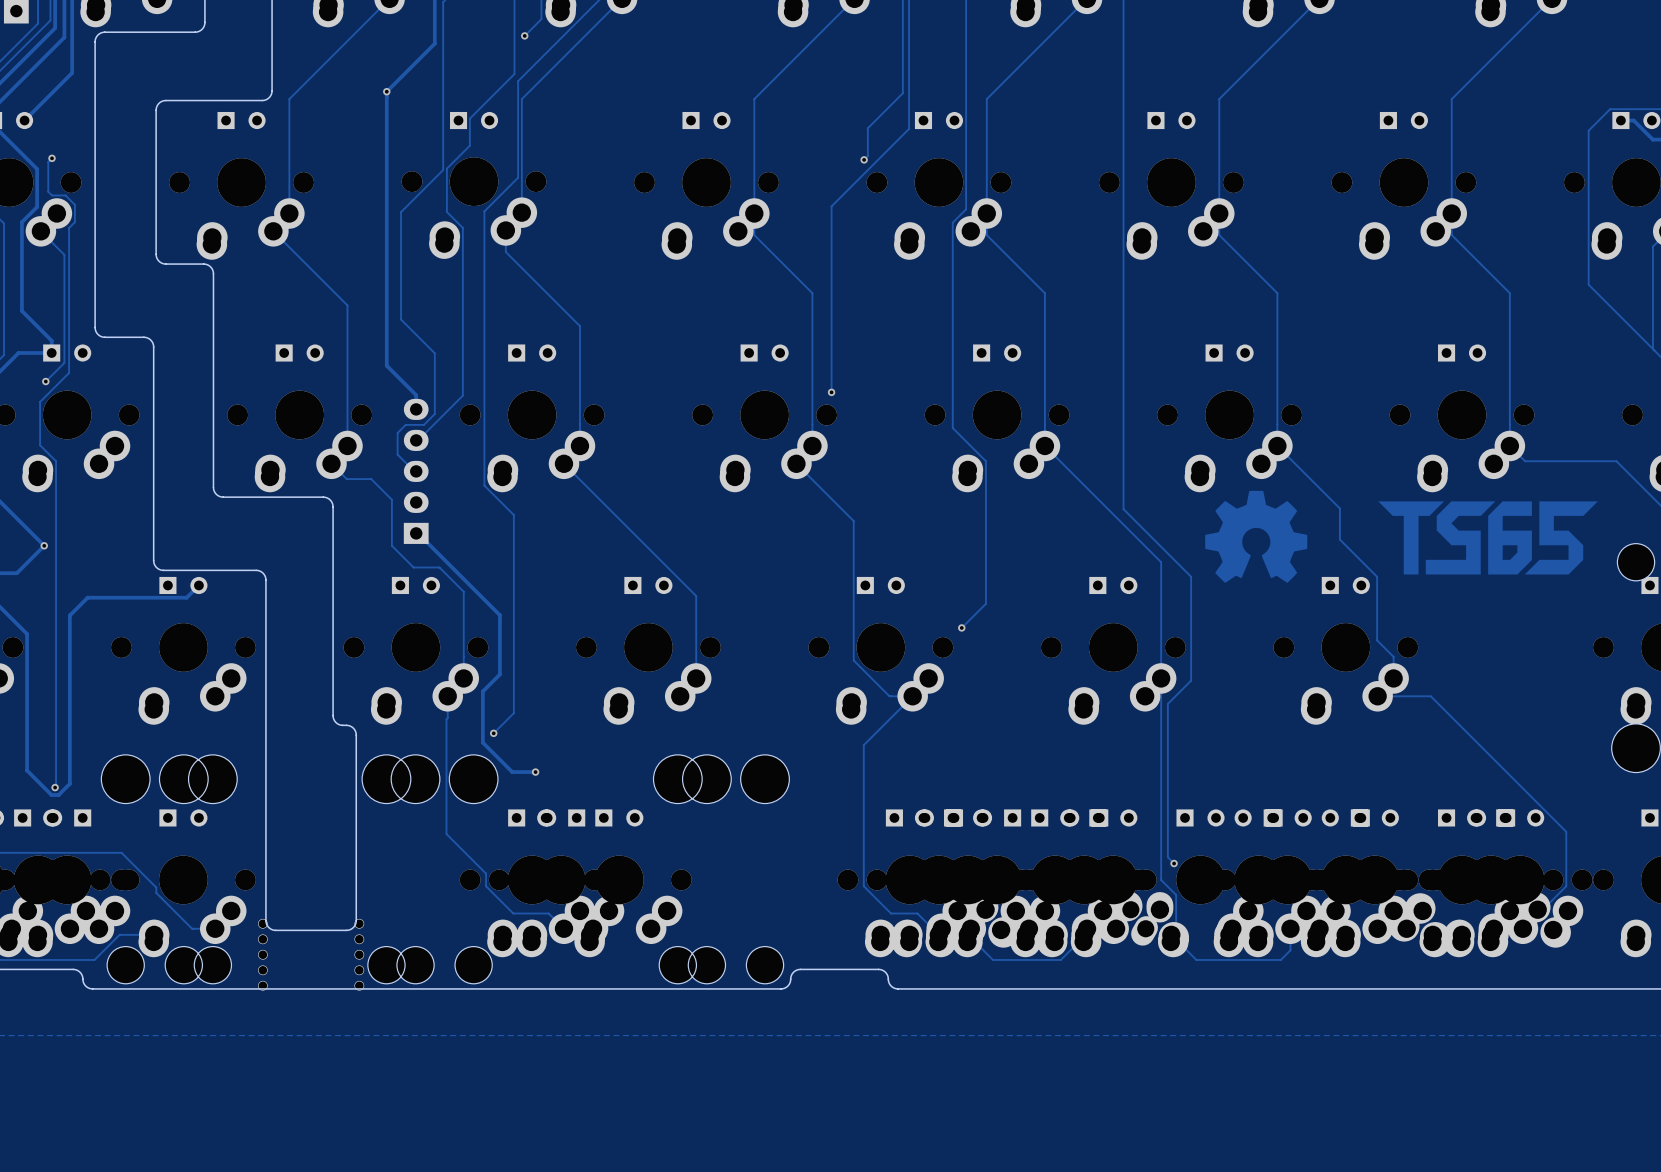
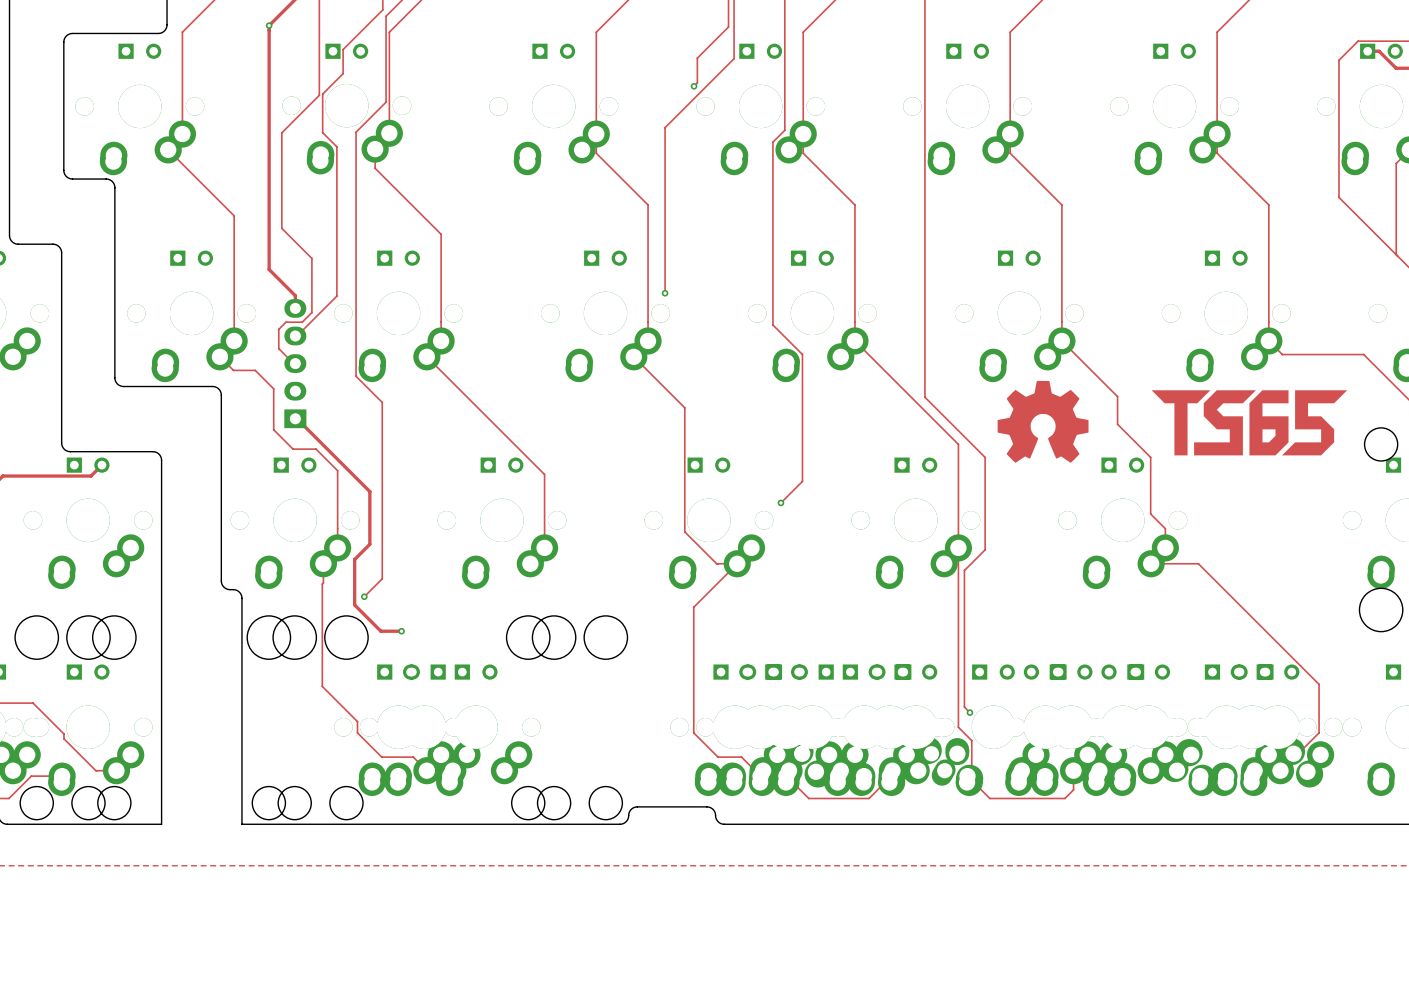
board edge: (265, 920) (268, 927) (275, 930) (347, 930) (354, 926) (356, 920) -> (161, 763) (161, 824)
part: (262, 954) -> none
part: (359, 954) -> none
board edge: (265, 988) (356, 988) -> (241, 763) (241, 824)

